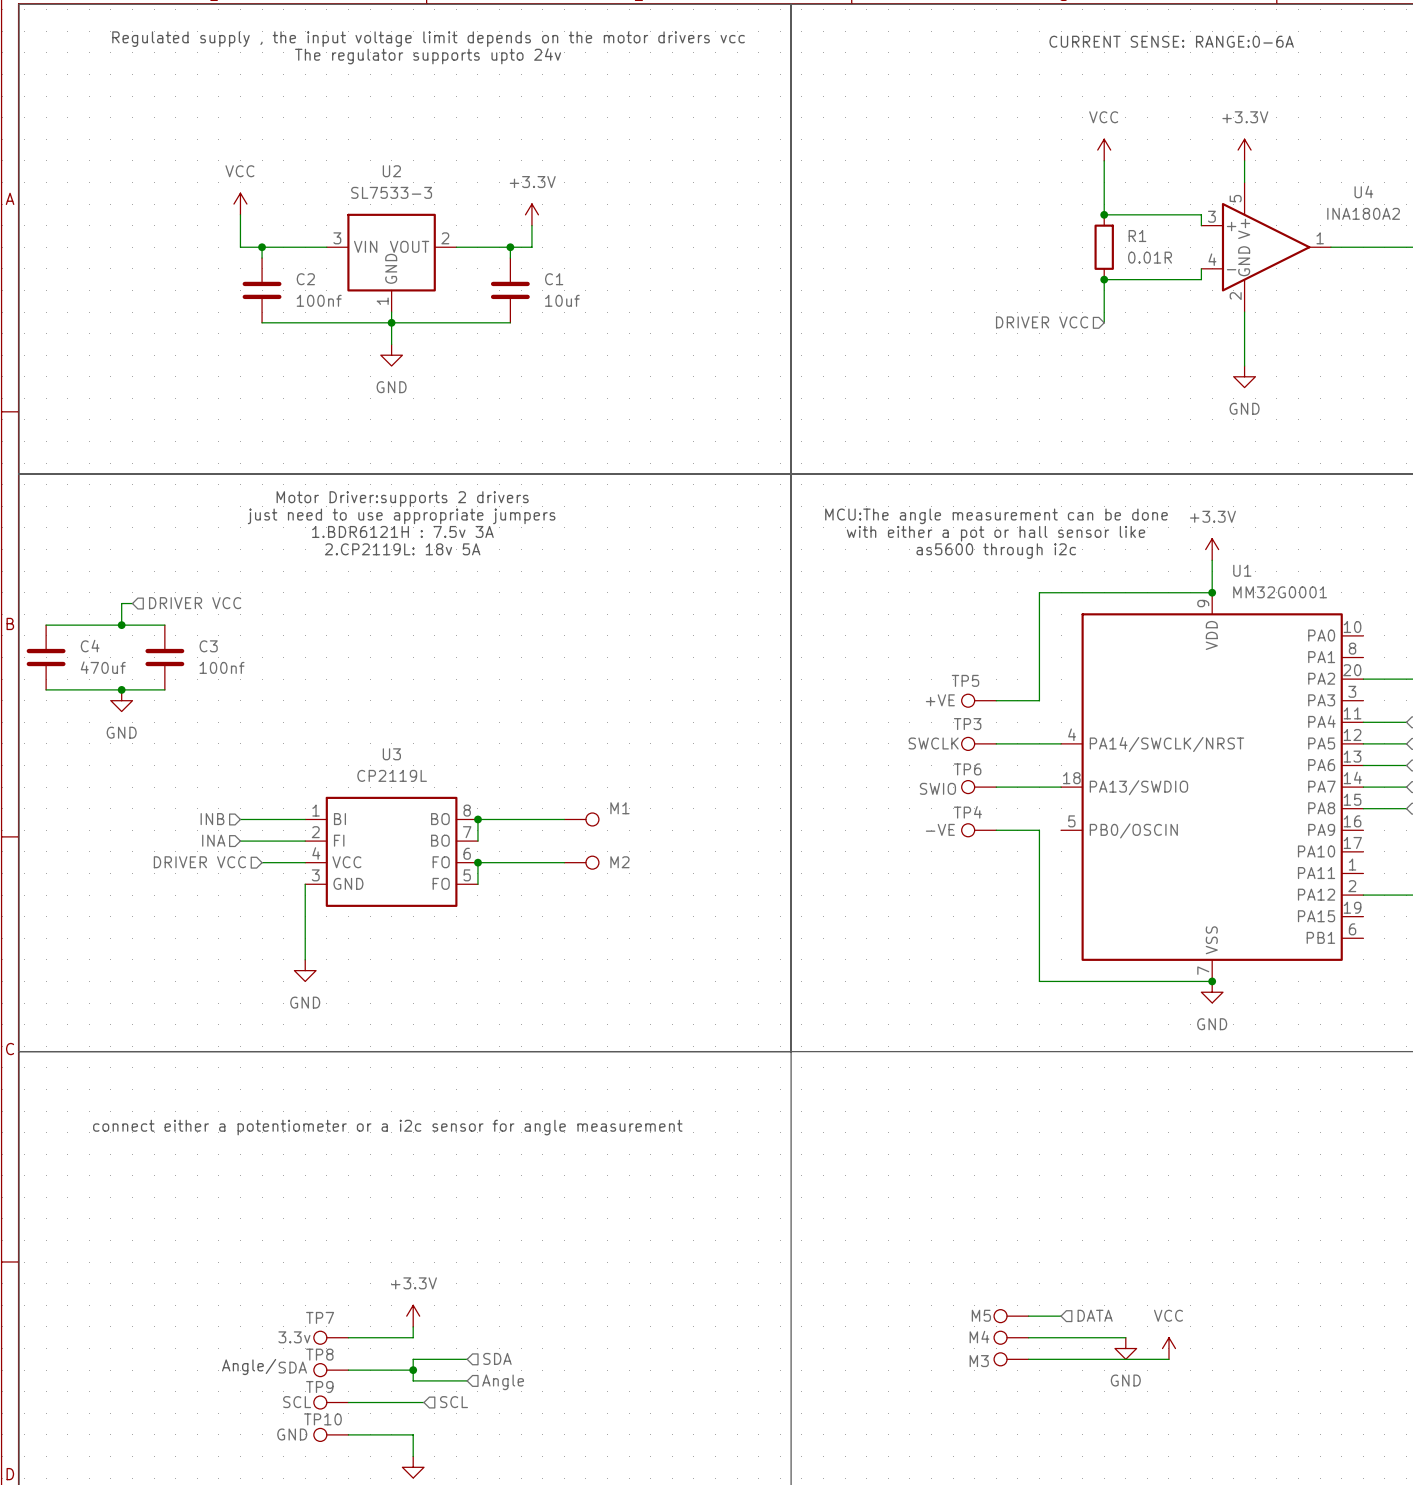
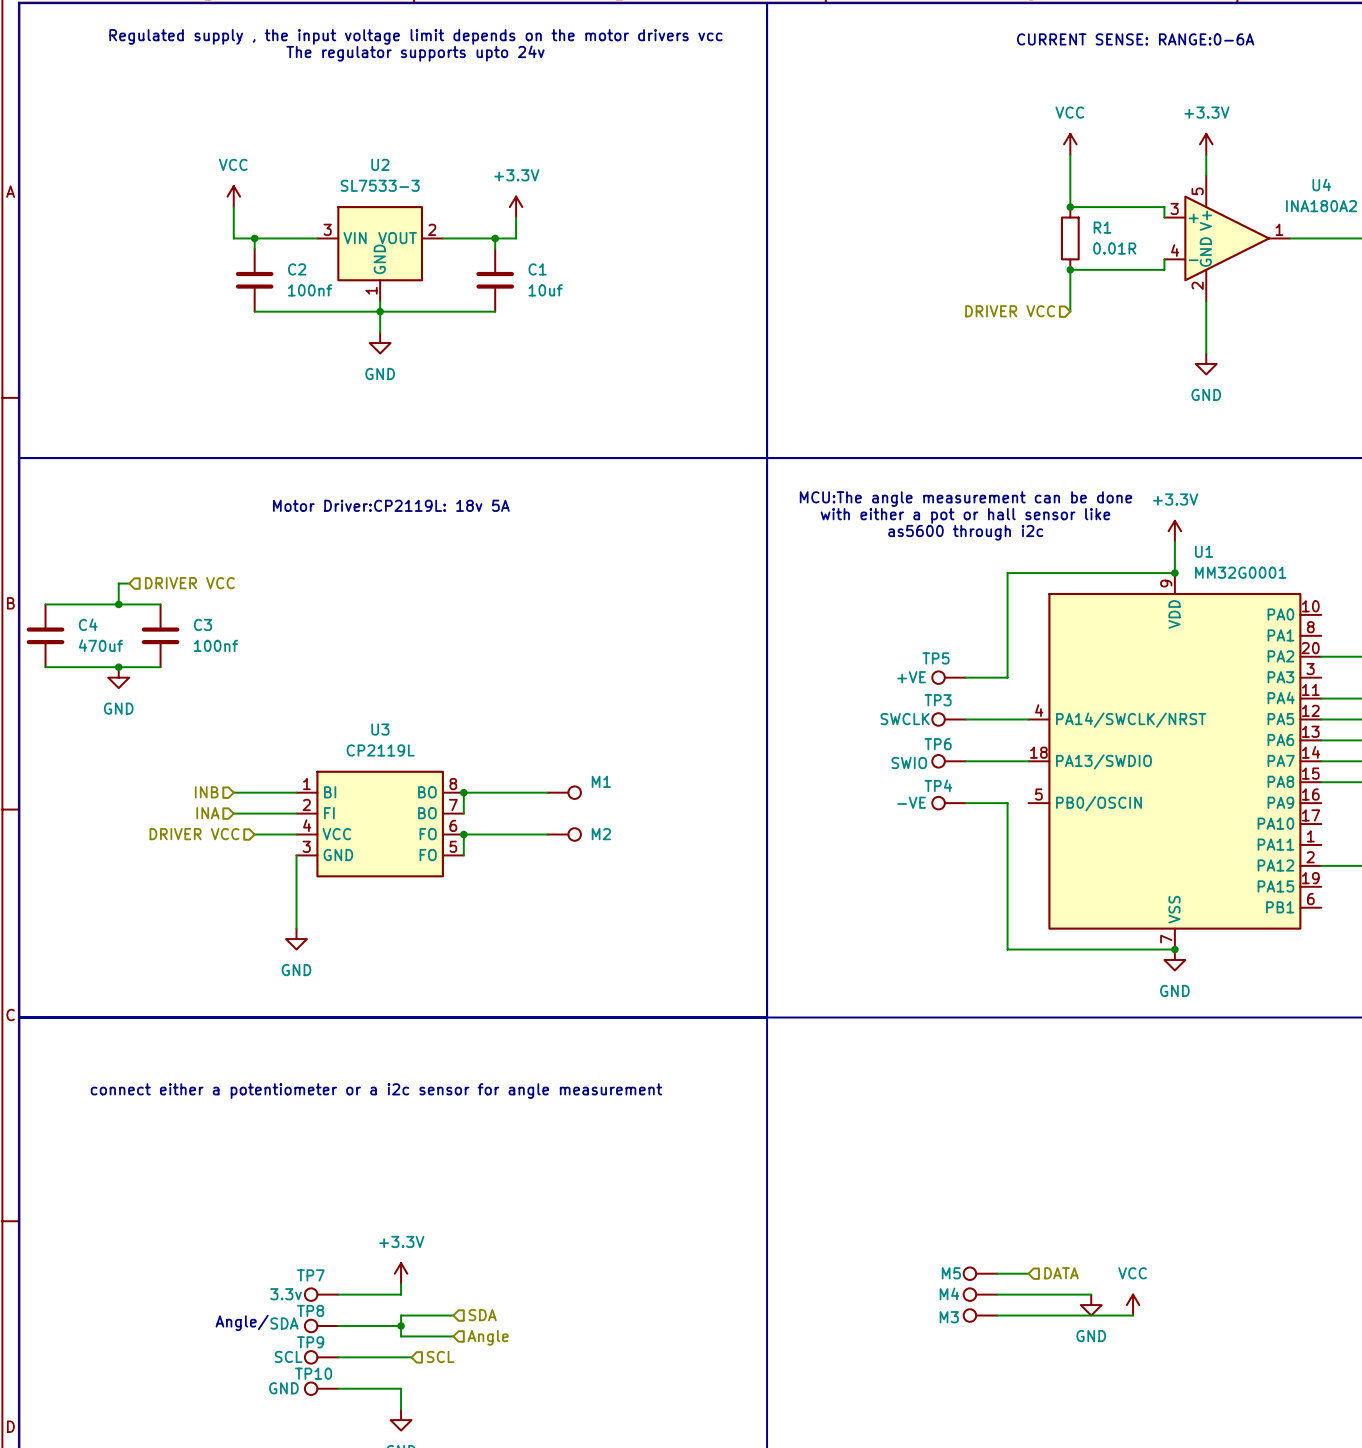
text: Motor Driver:supports 2 drivers (402, 498) -> none
text: just need to use appropriate jumpers (401, 516) -> none
text: none -> Motor Driver:CP2119L: 18v 5A (391, 505)
text: 1.BDR6121H : 7.5v 3A (402, 531) -> none
text: 2.CP2119L: 18v 5A (402, 549) -> none

